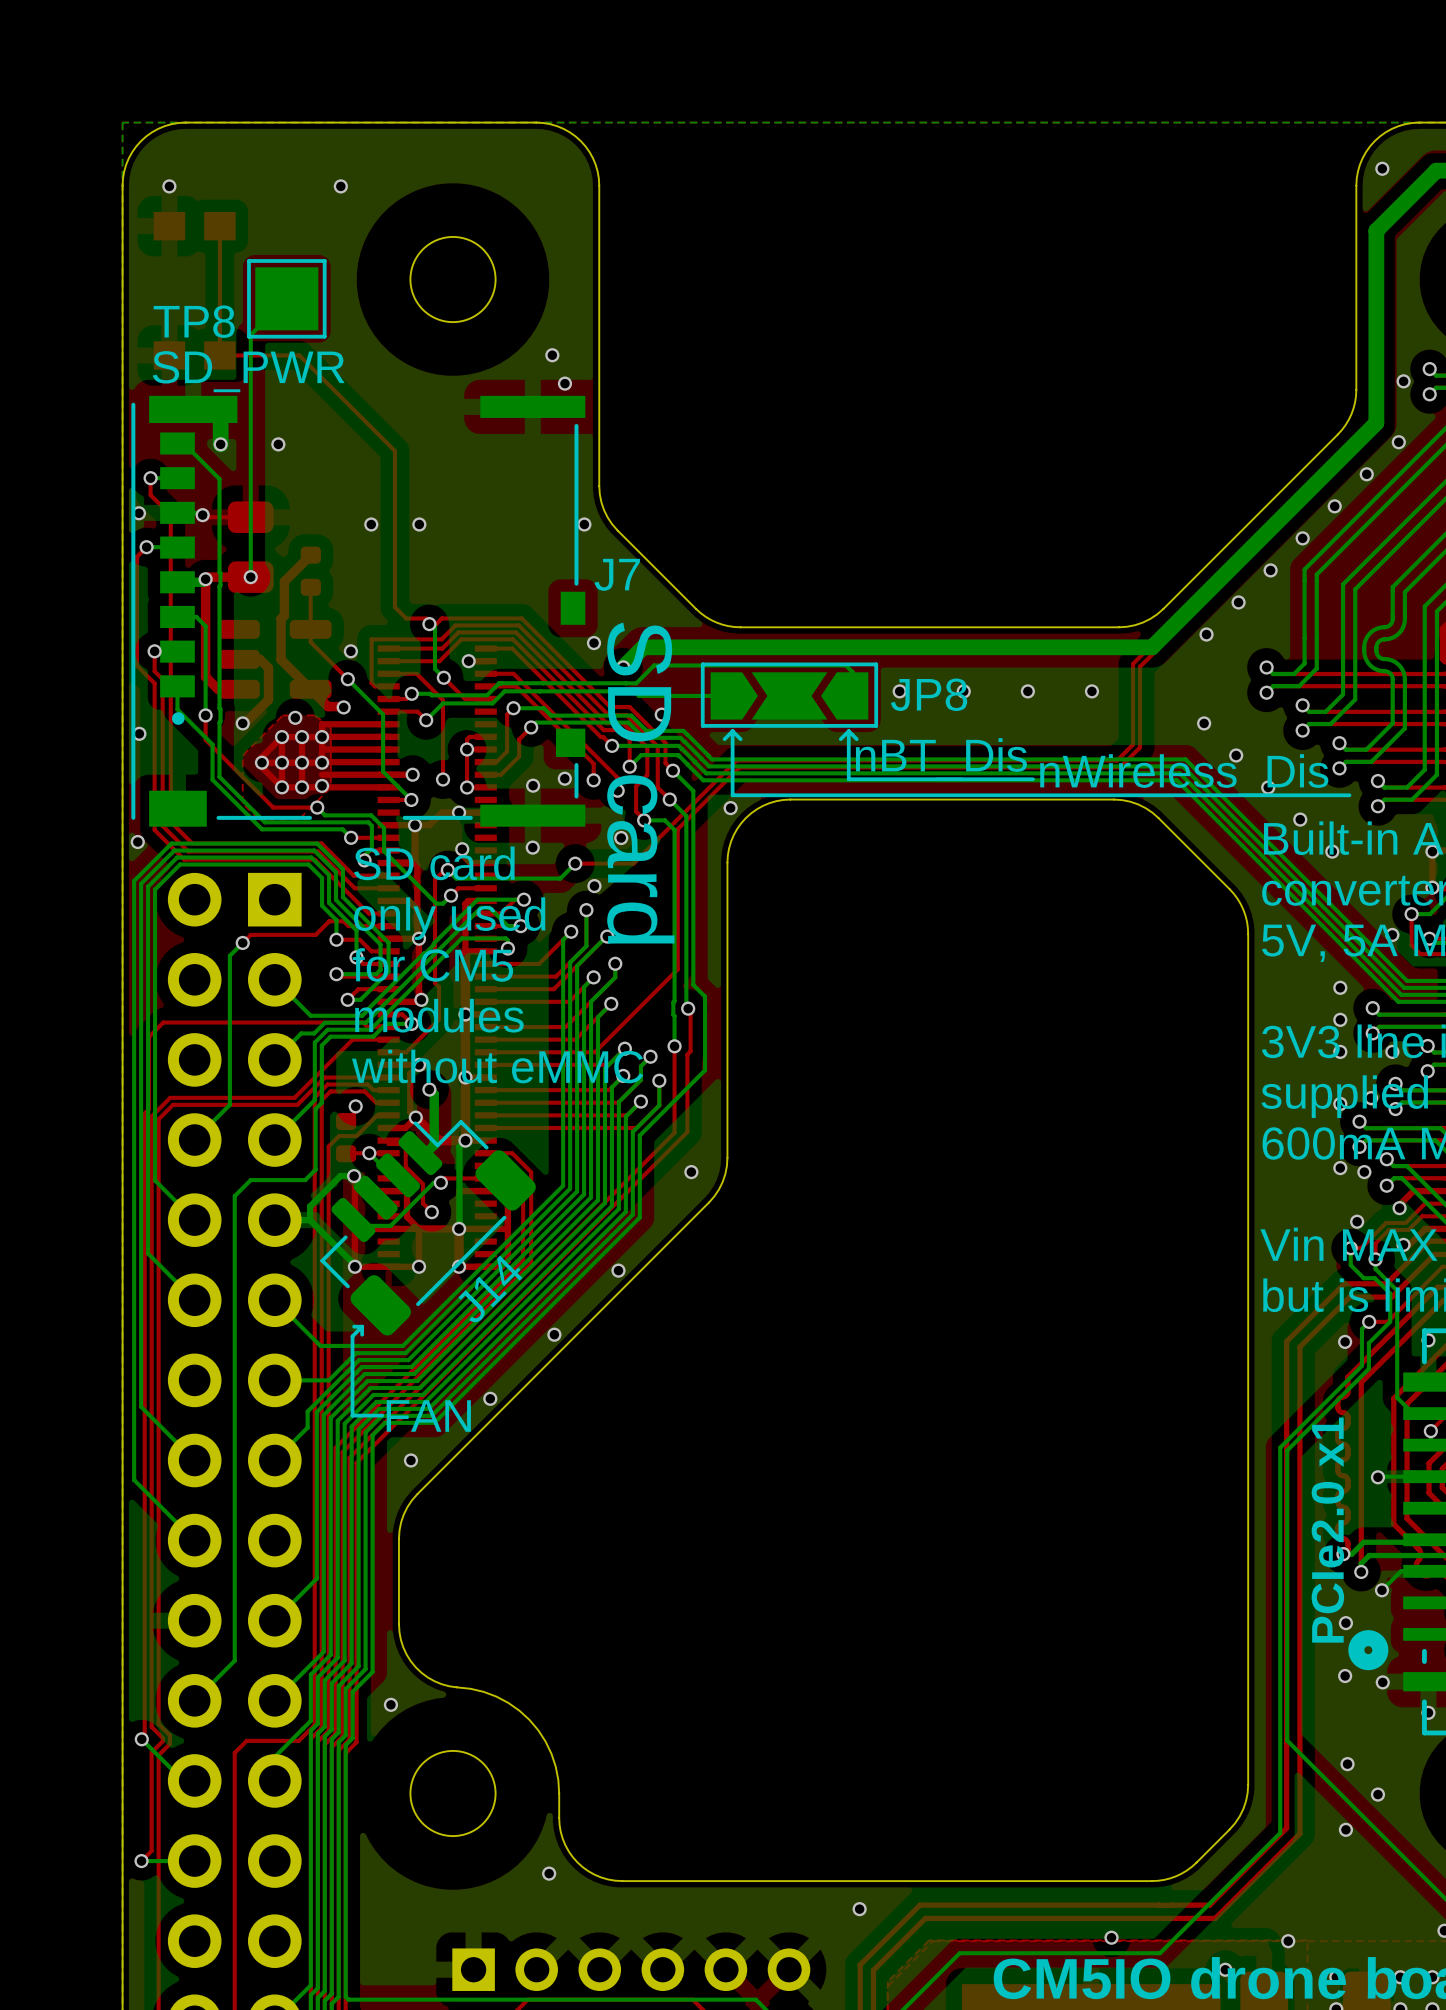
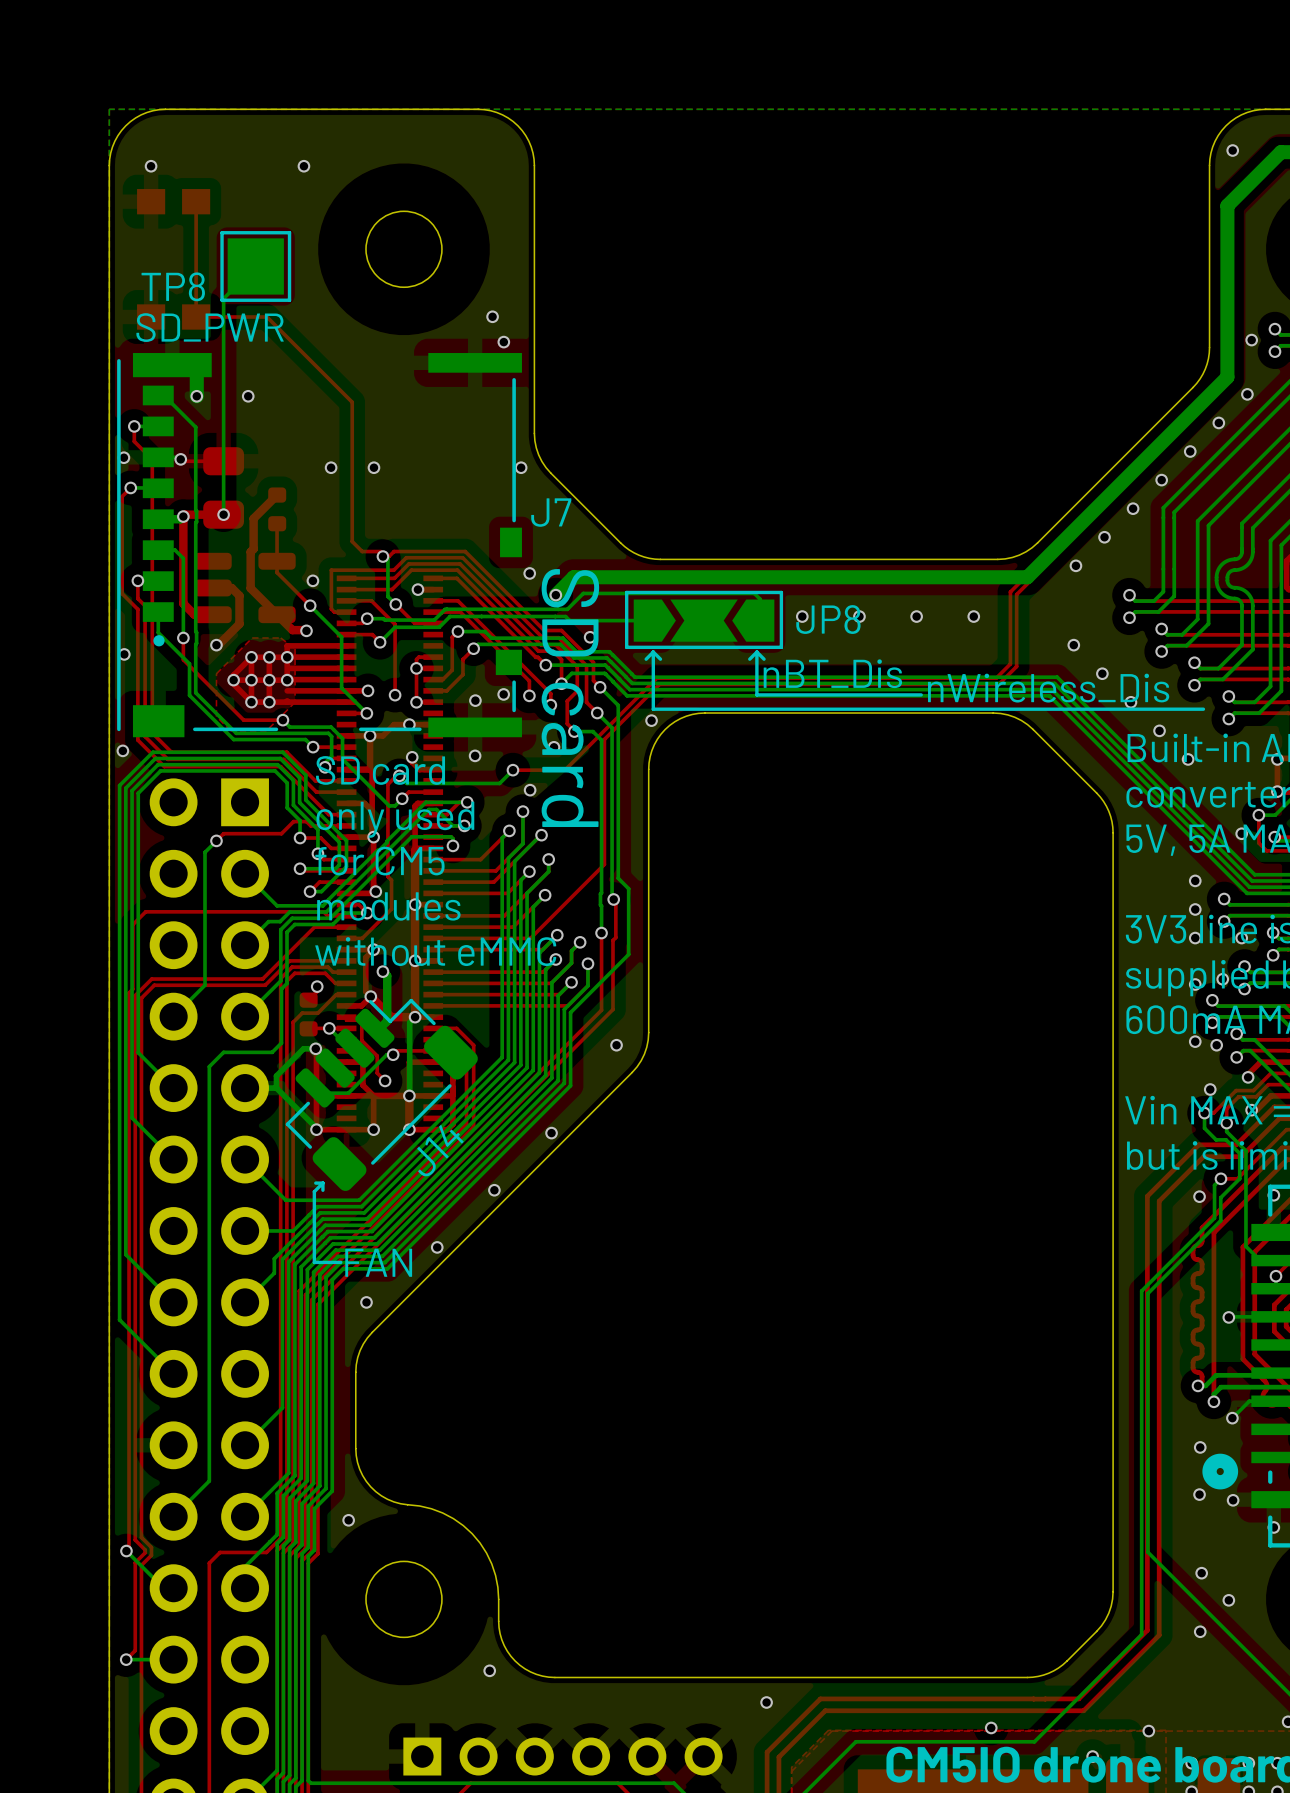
via: (295, 717) -> none
via: (322, 785) -> none
text: PCIe2.0 x1 (1327, 1530) -> none

